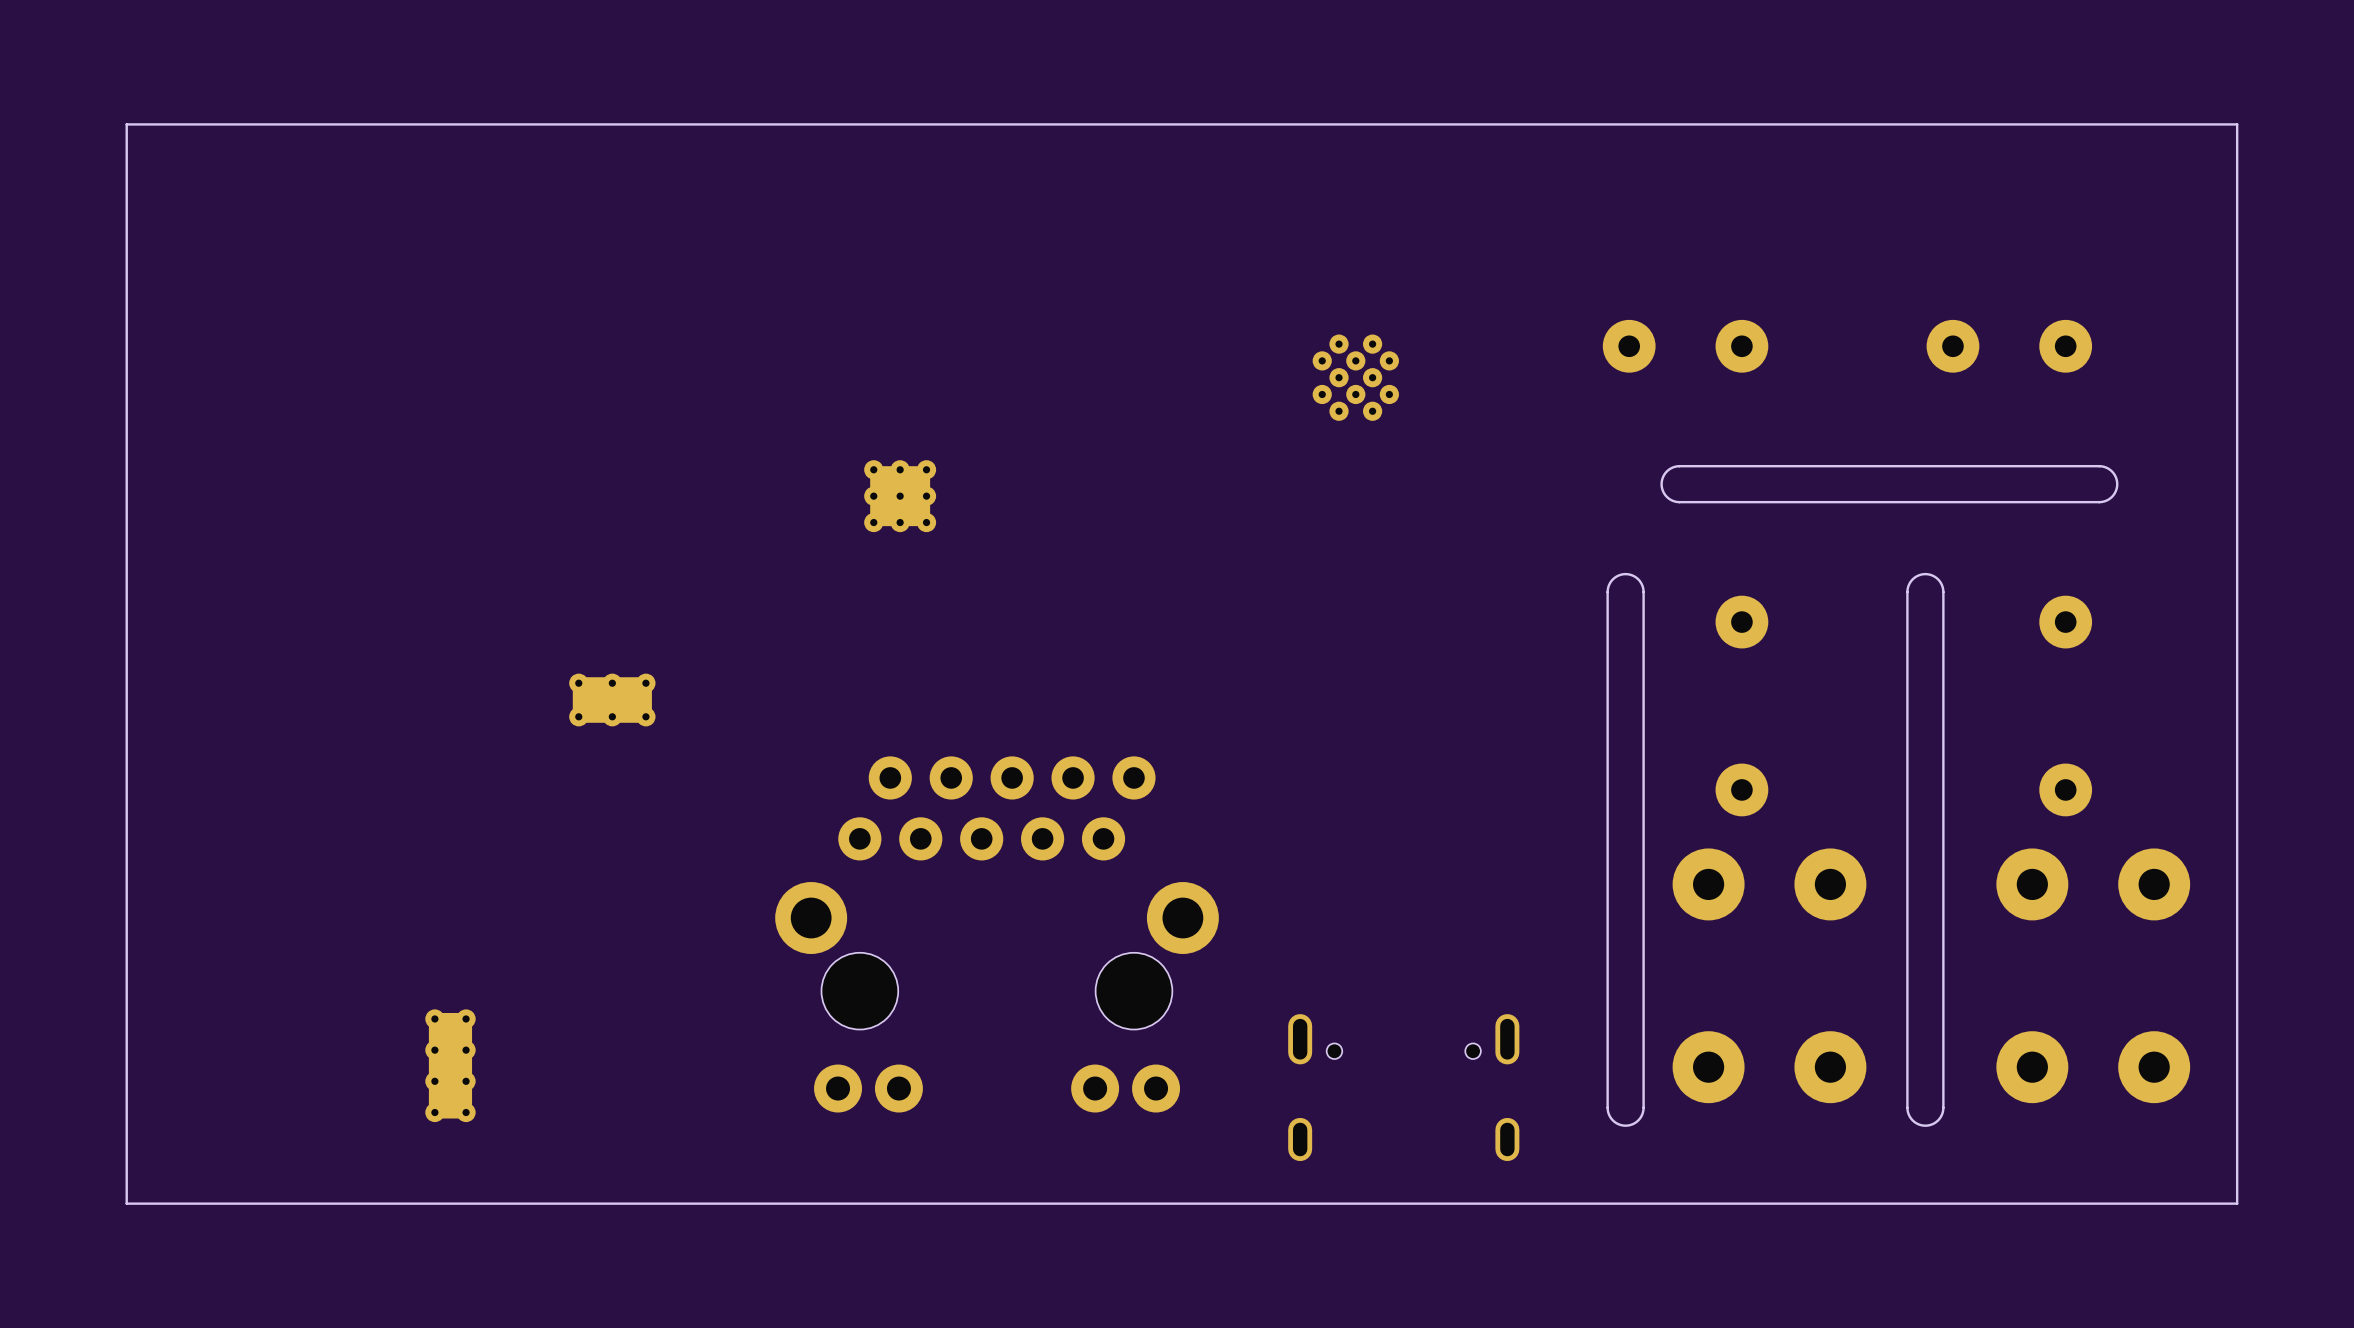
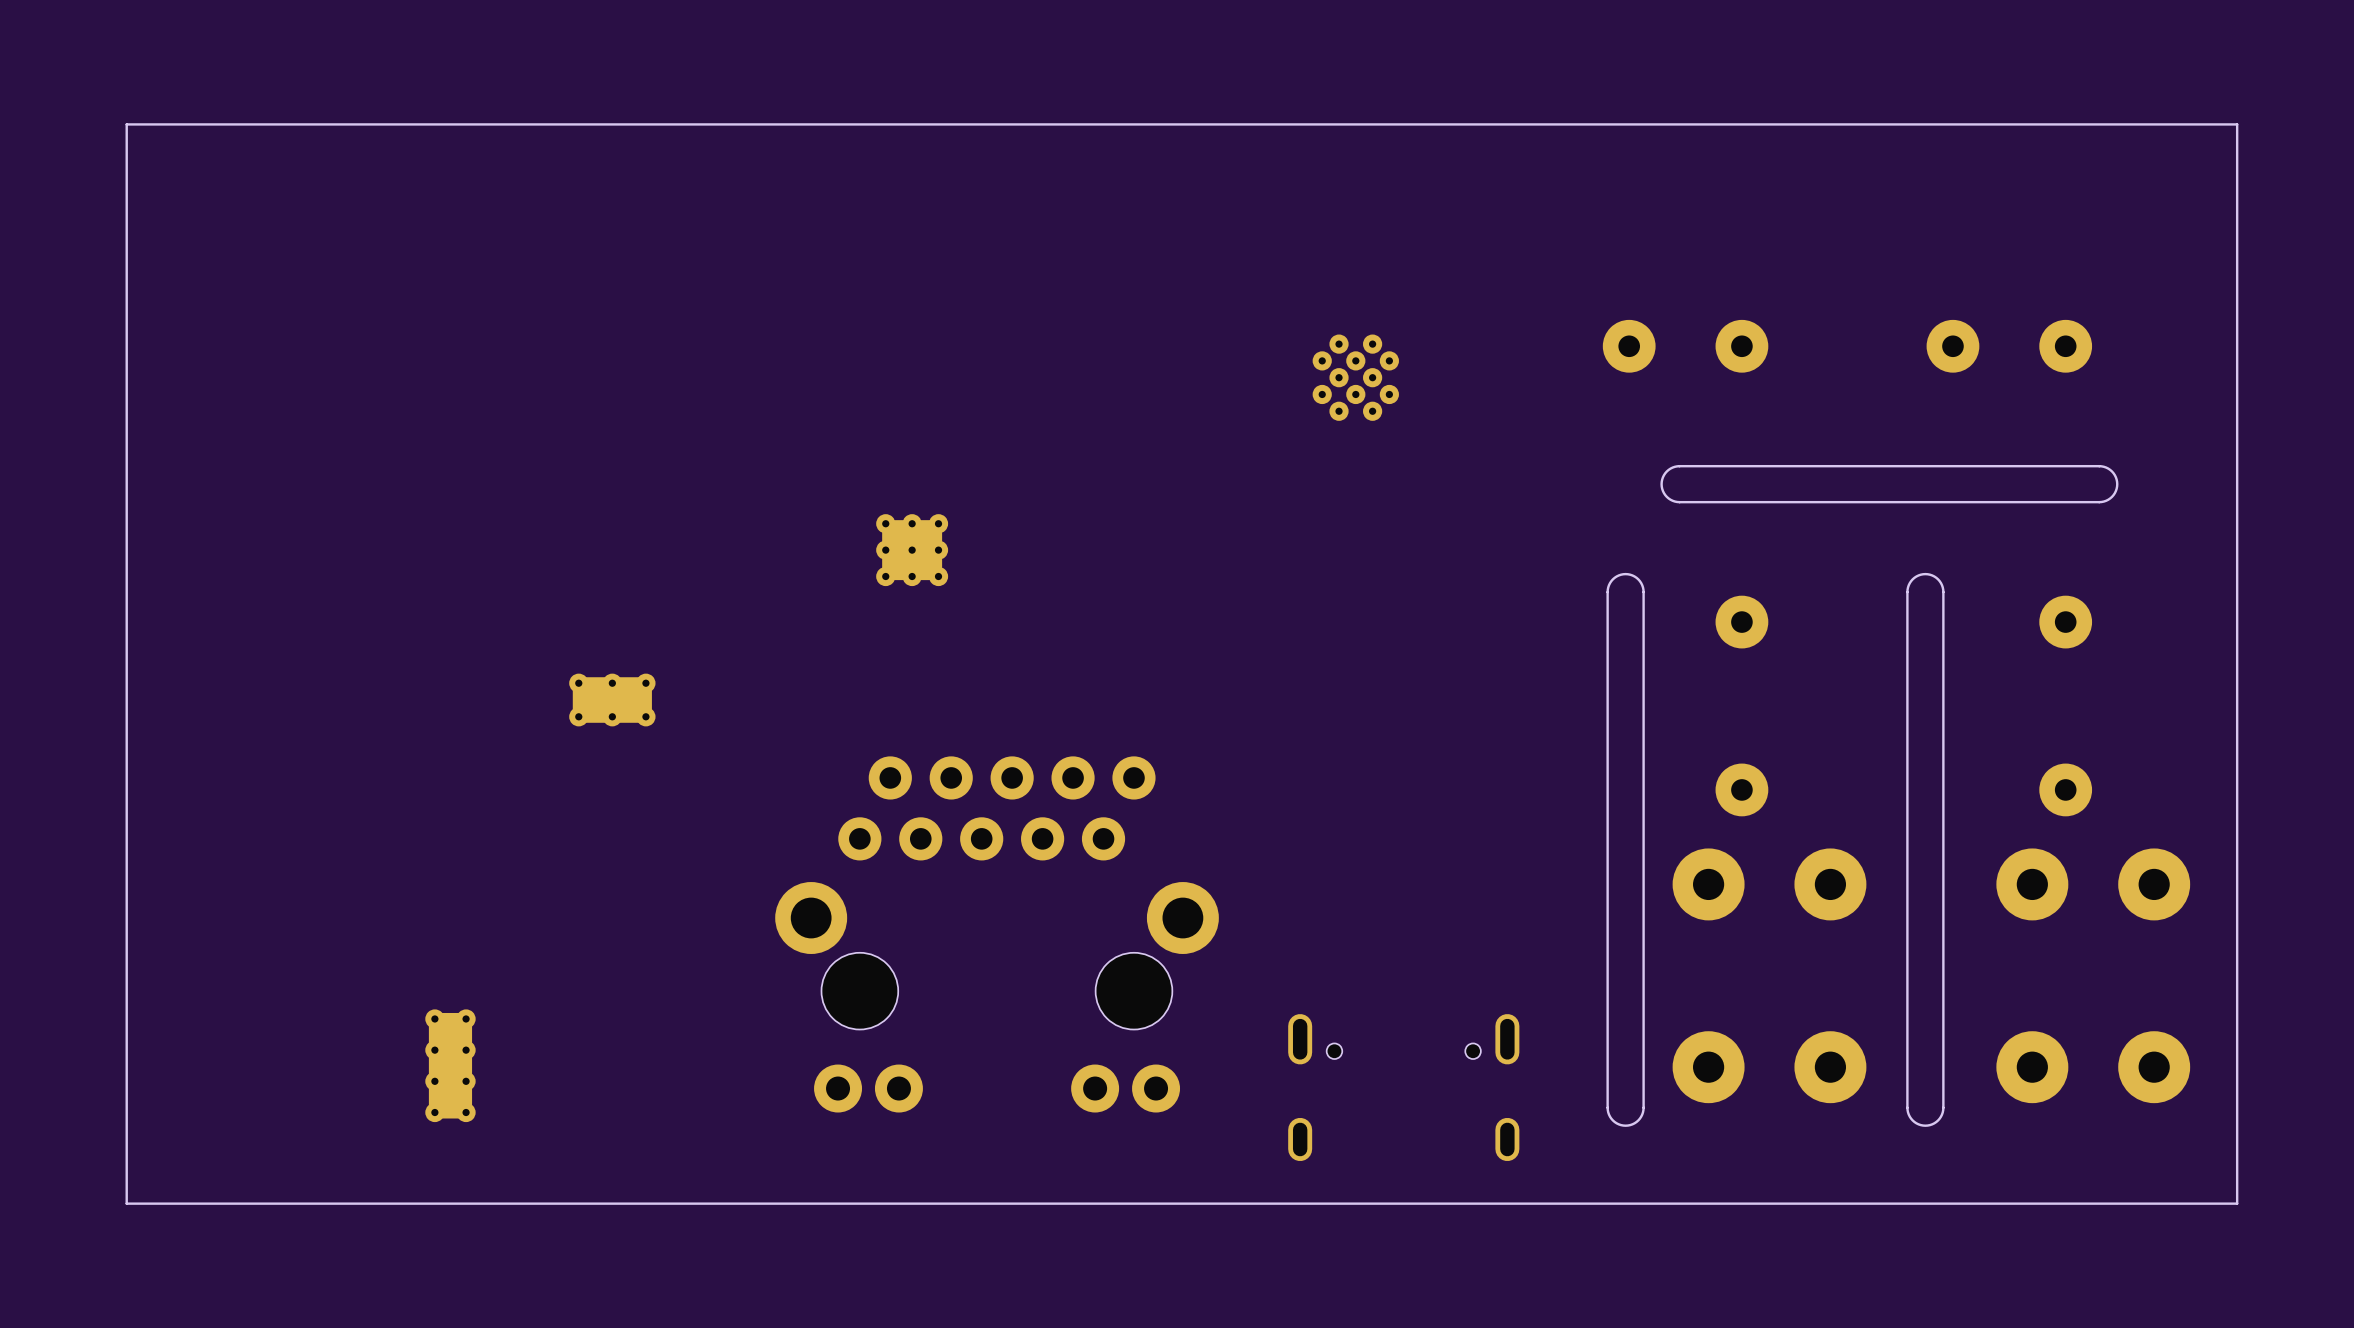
part position: (900, 496) -> (912, 550)

